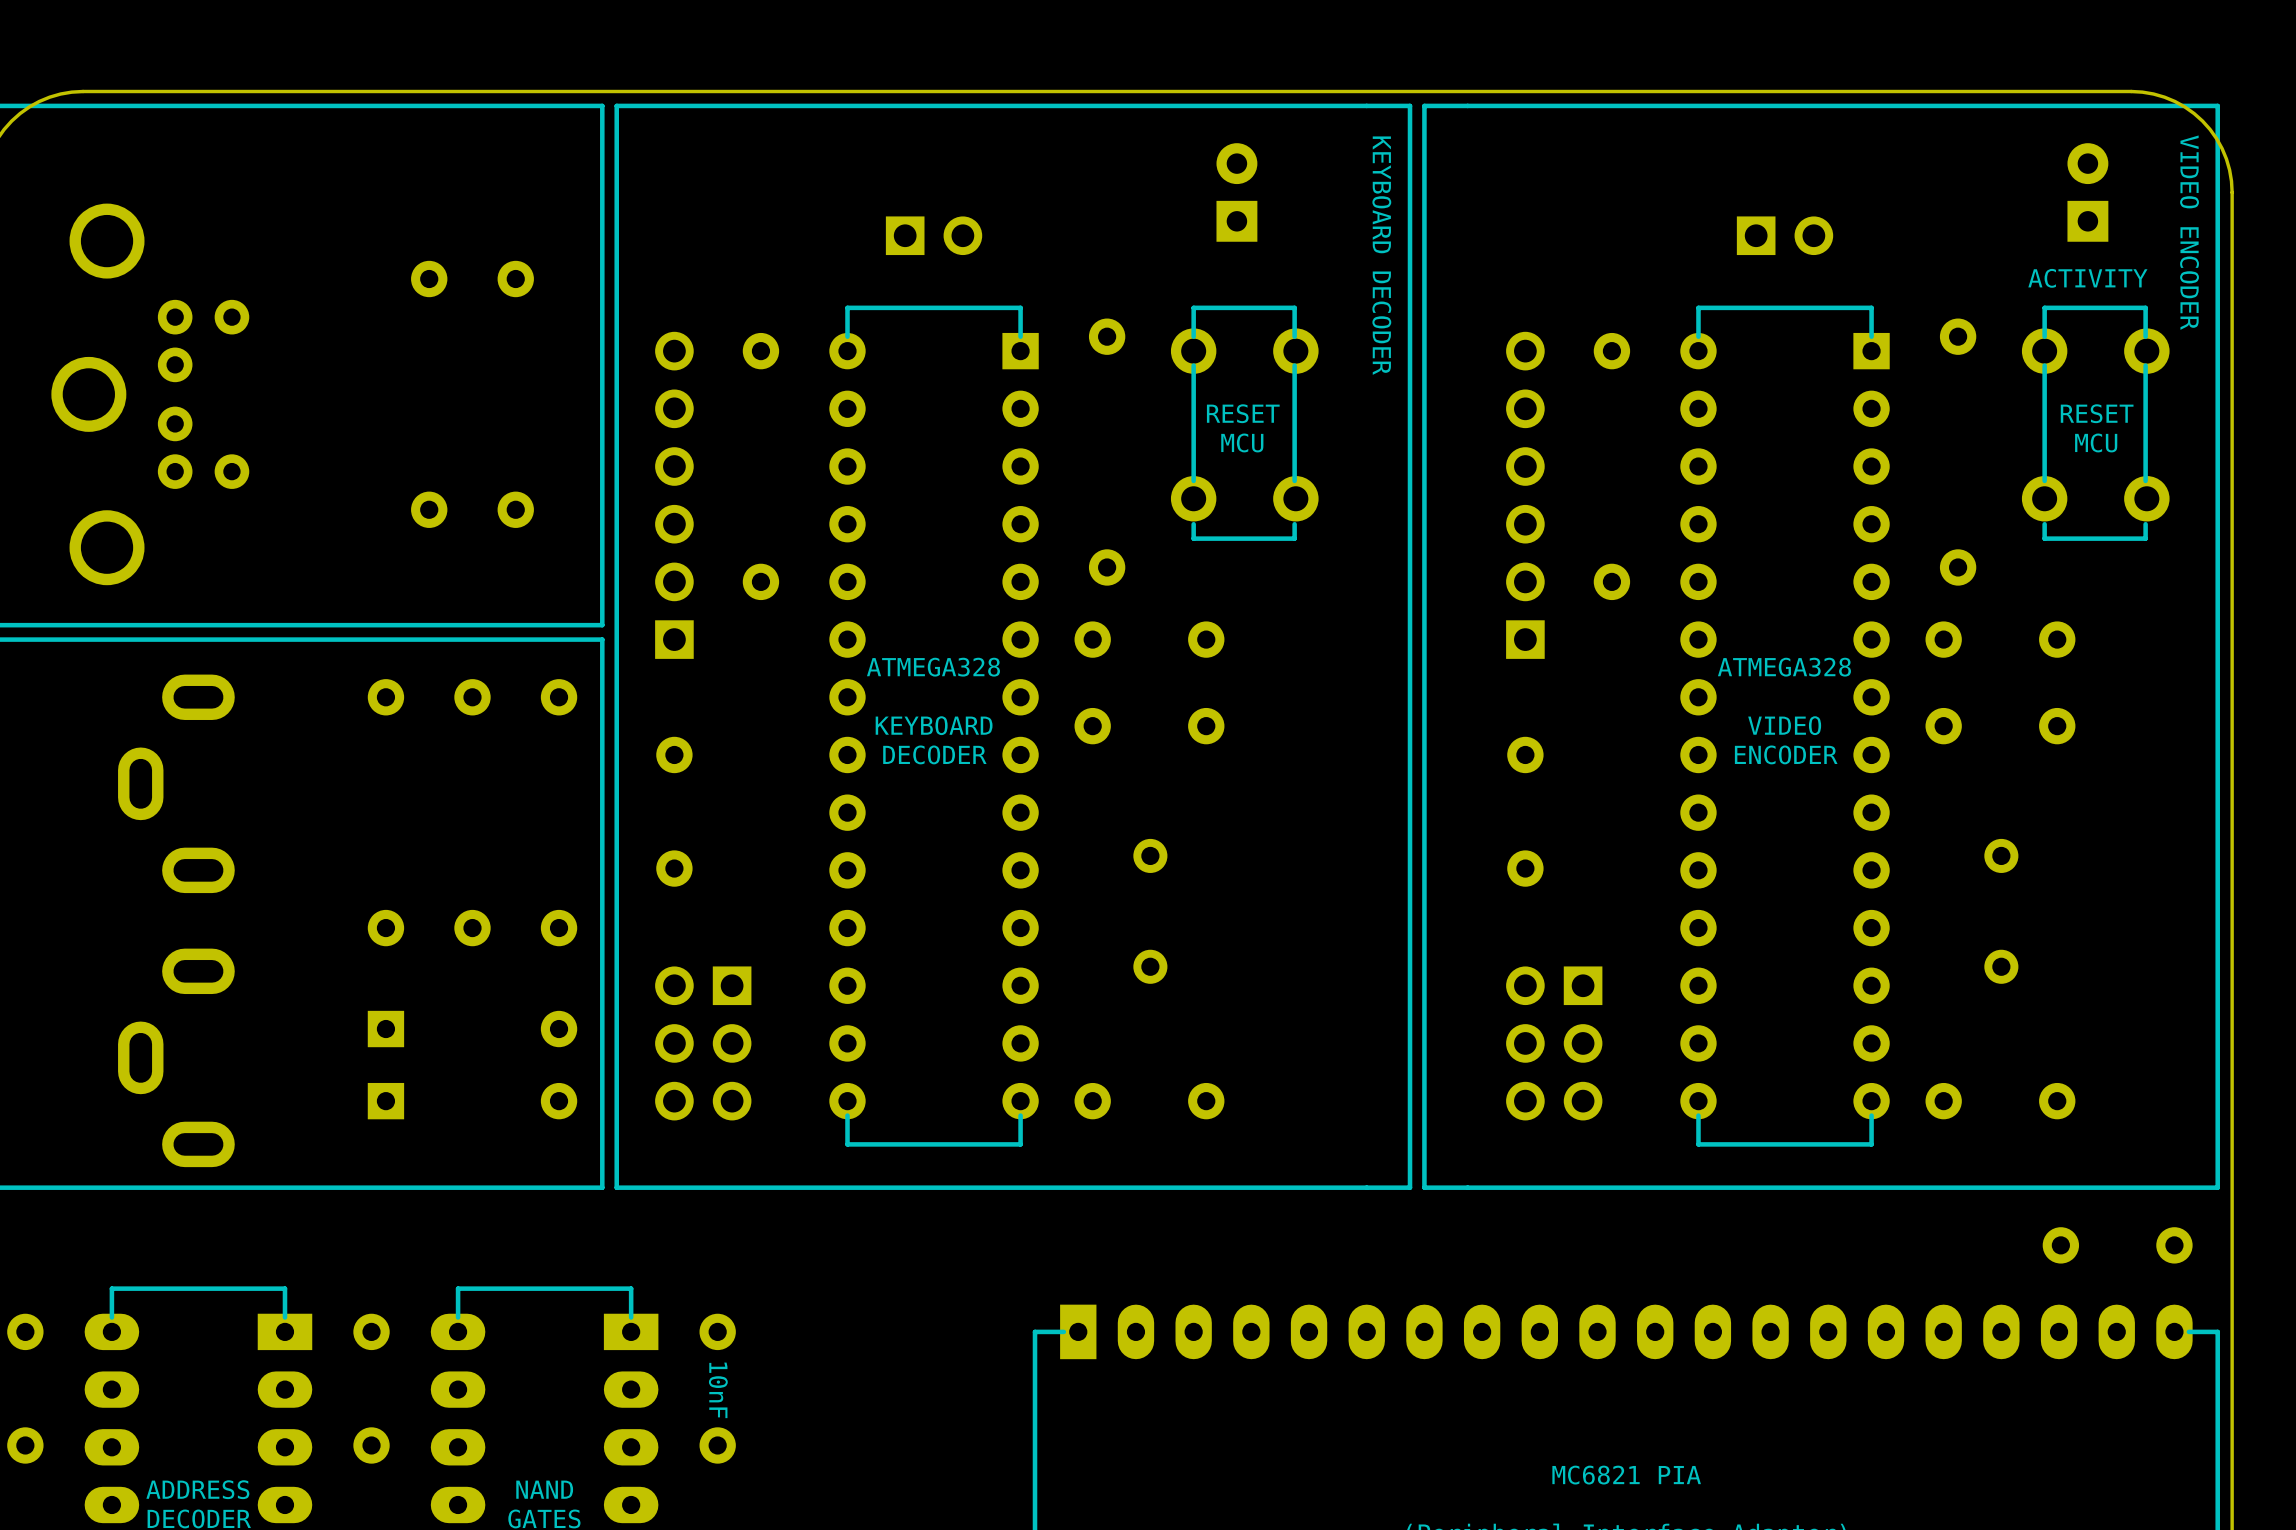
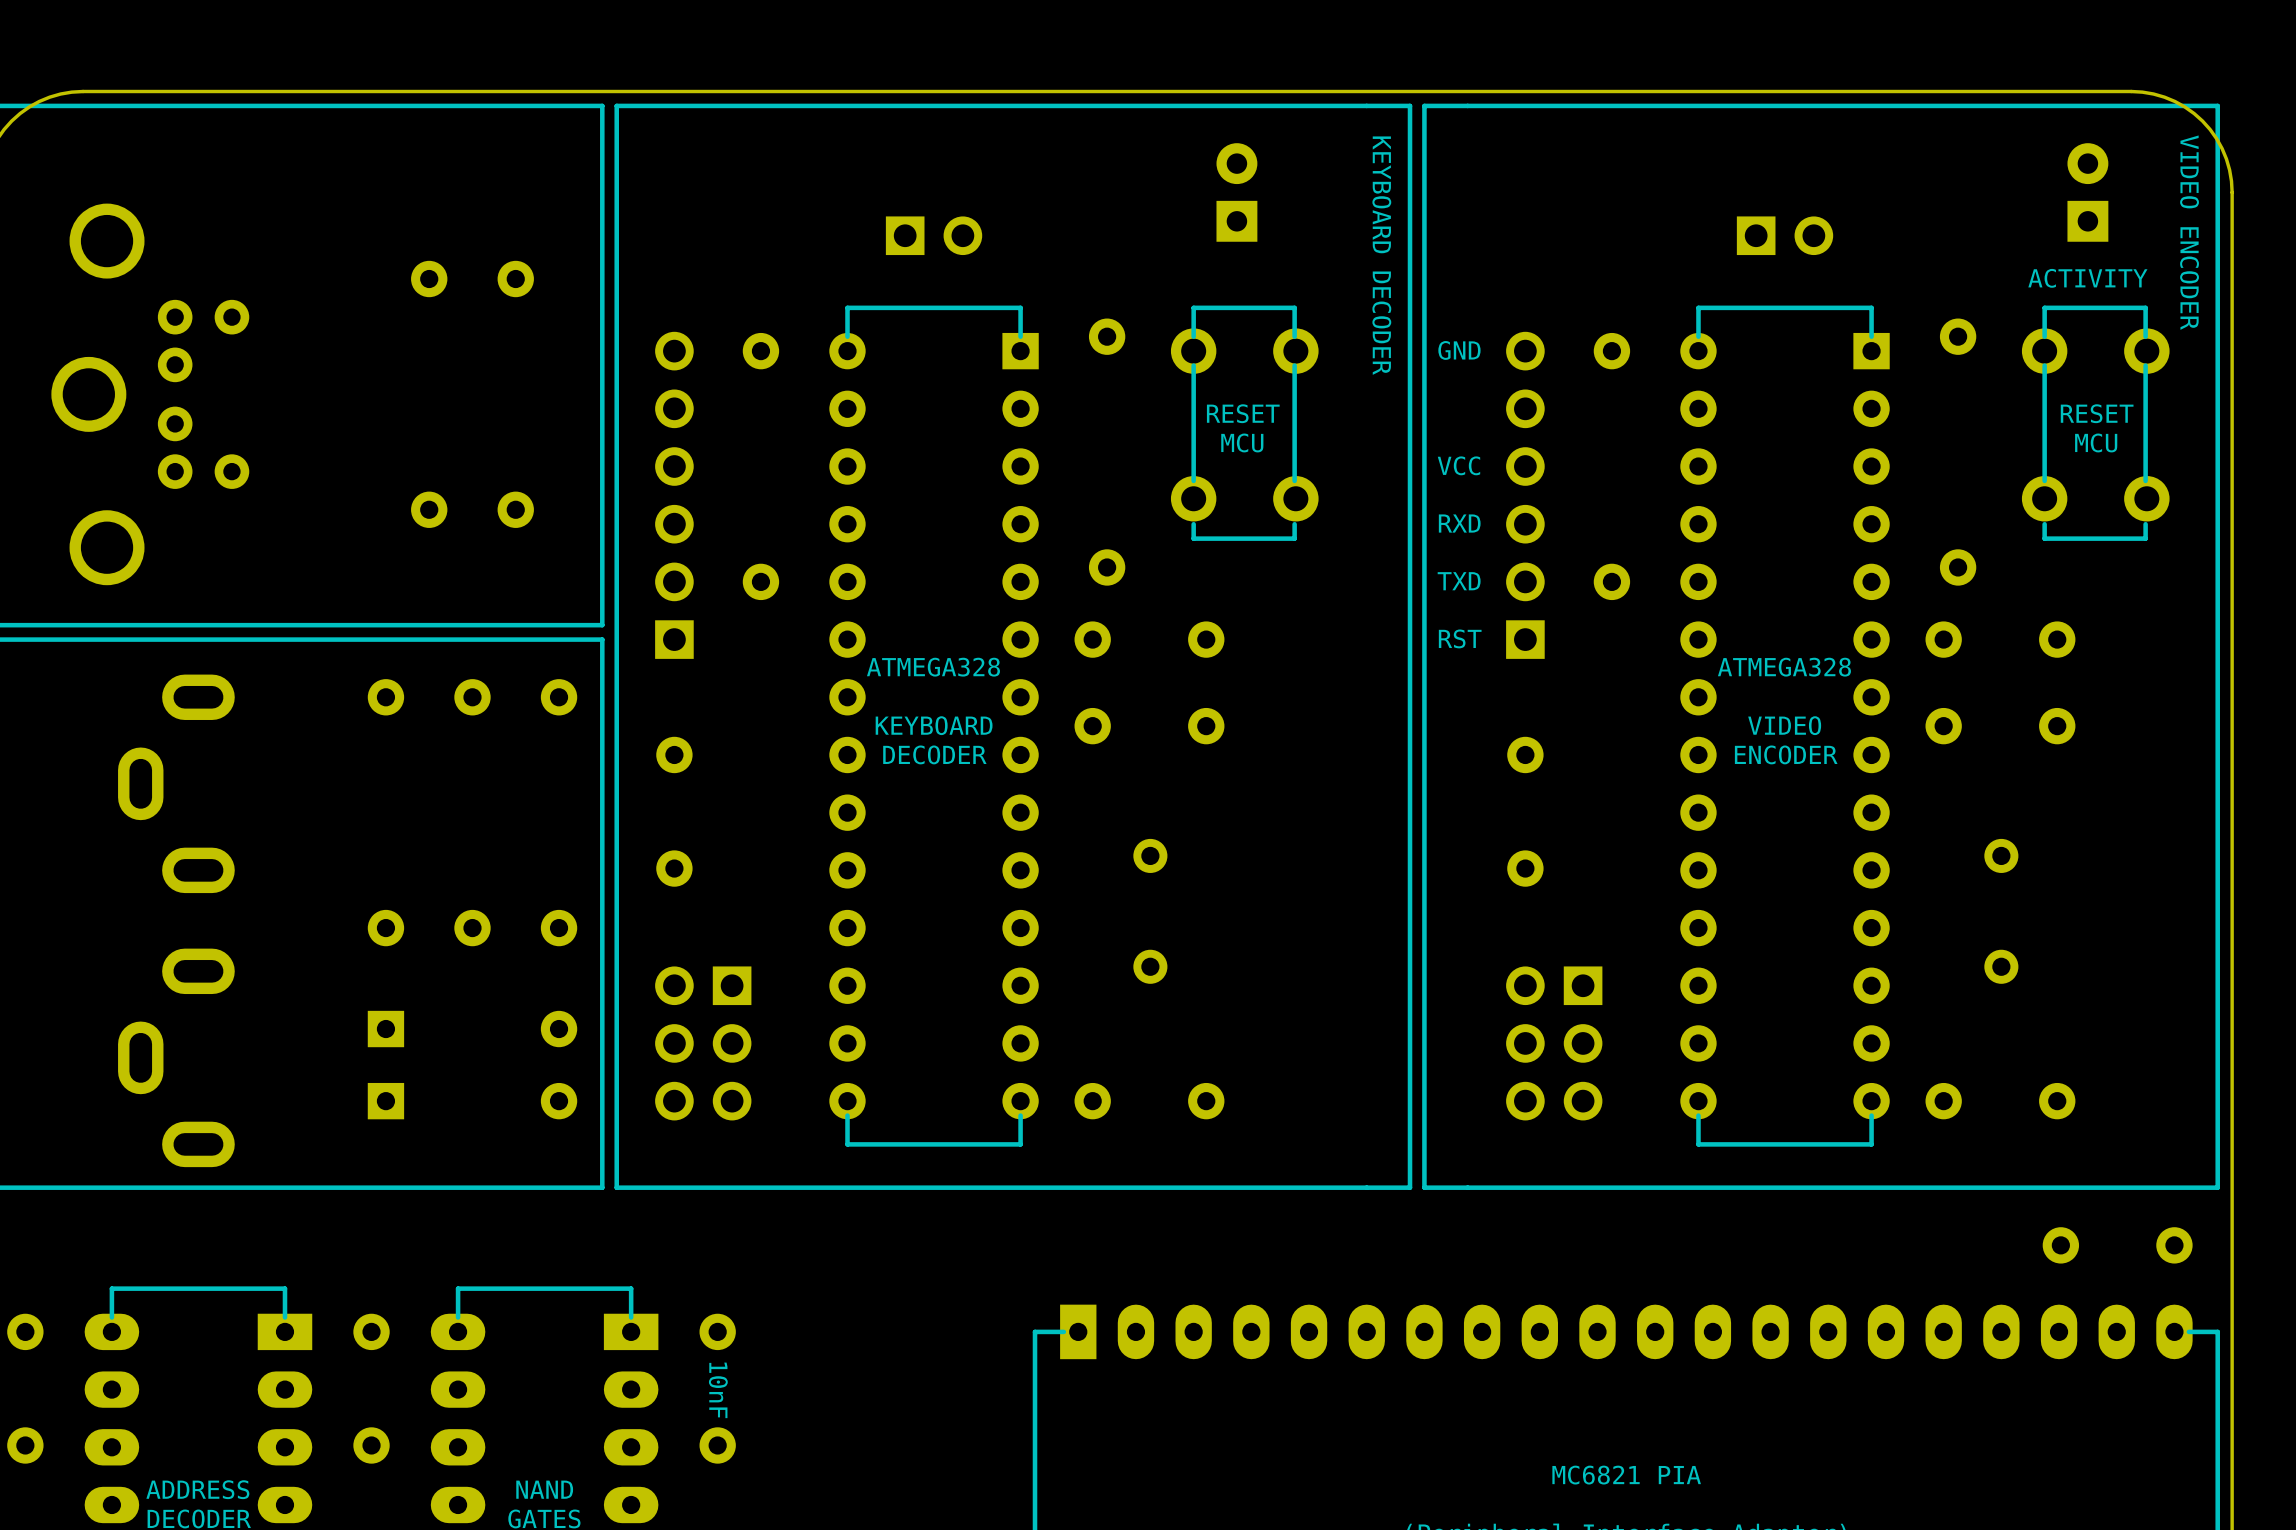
text: none -> GND (1459, 350)
text: none -> VCC (1458, 465)
text: none -> RXD (1459, 523)
text: none -> TXD (1459, 581)
text: none -> RST (1460, 638)

